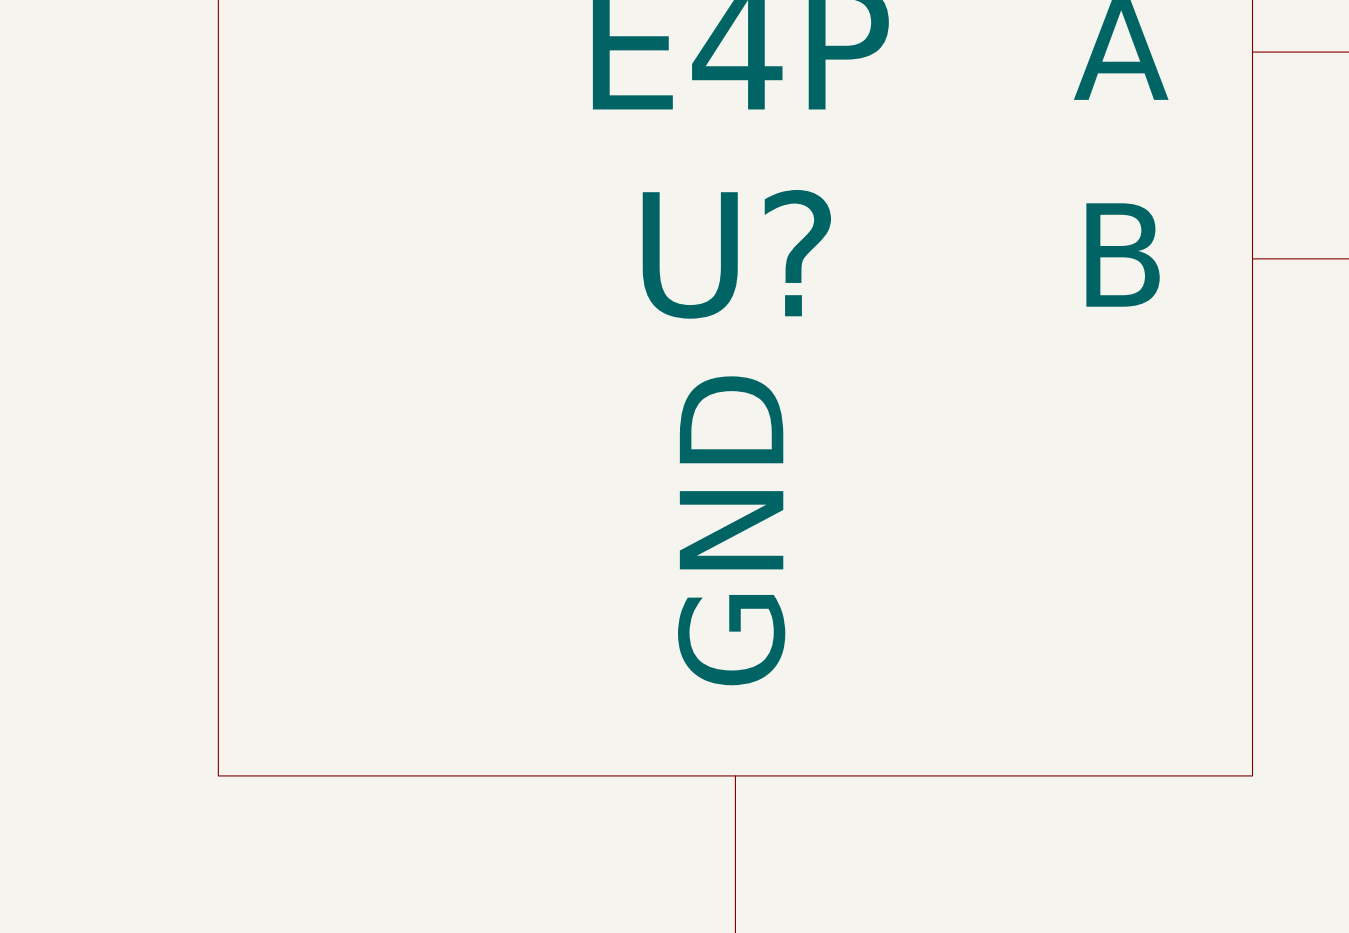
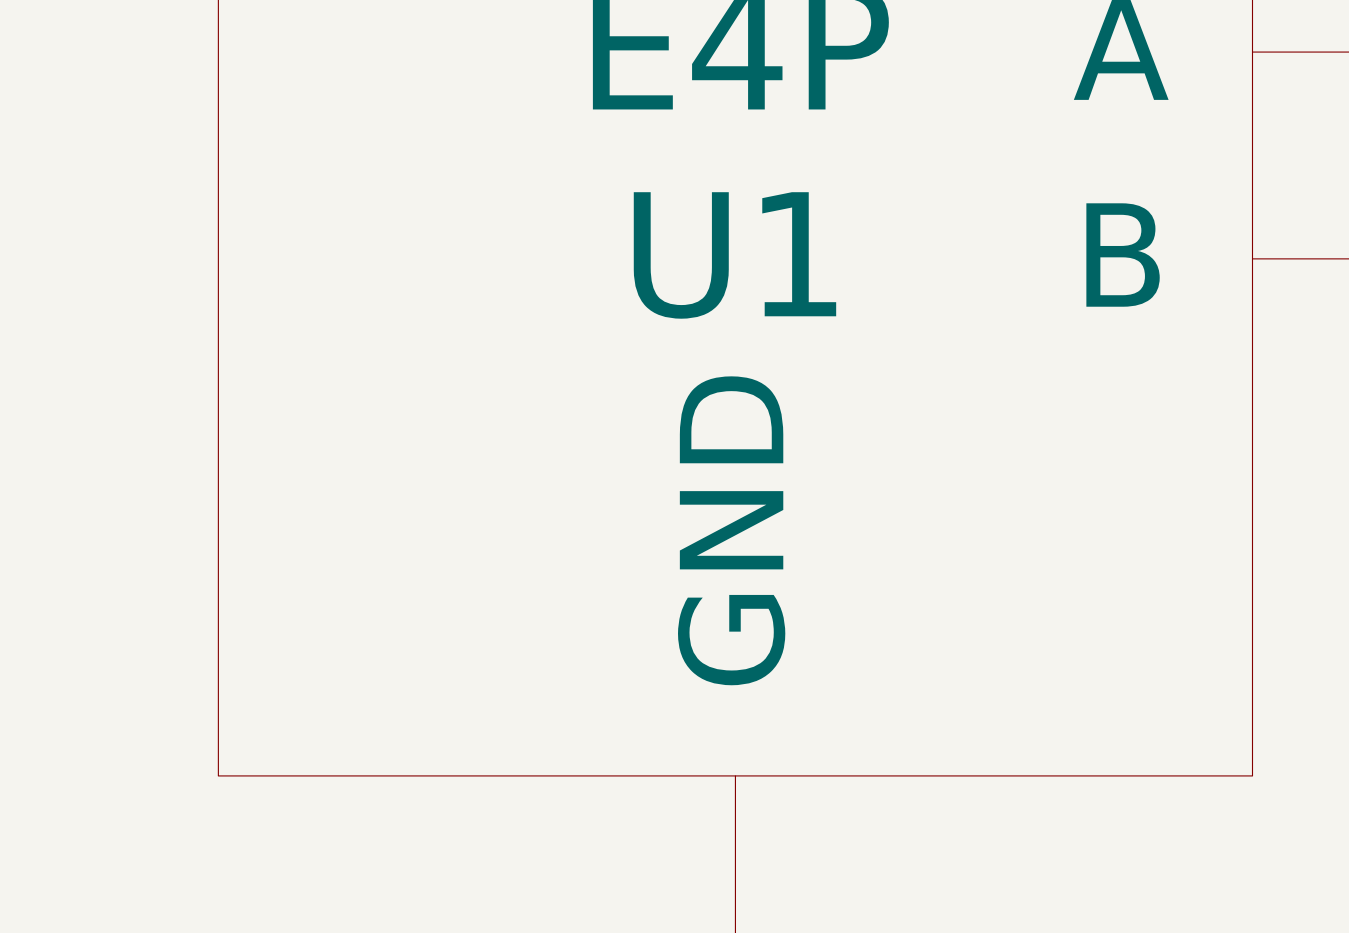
U? name: U? (736, 254) -> U1 (734, 255)

